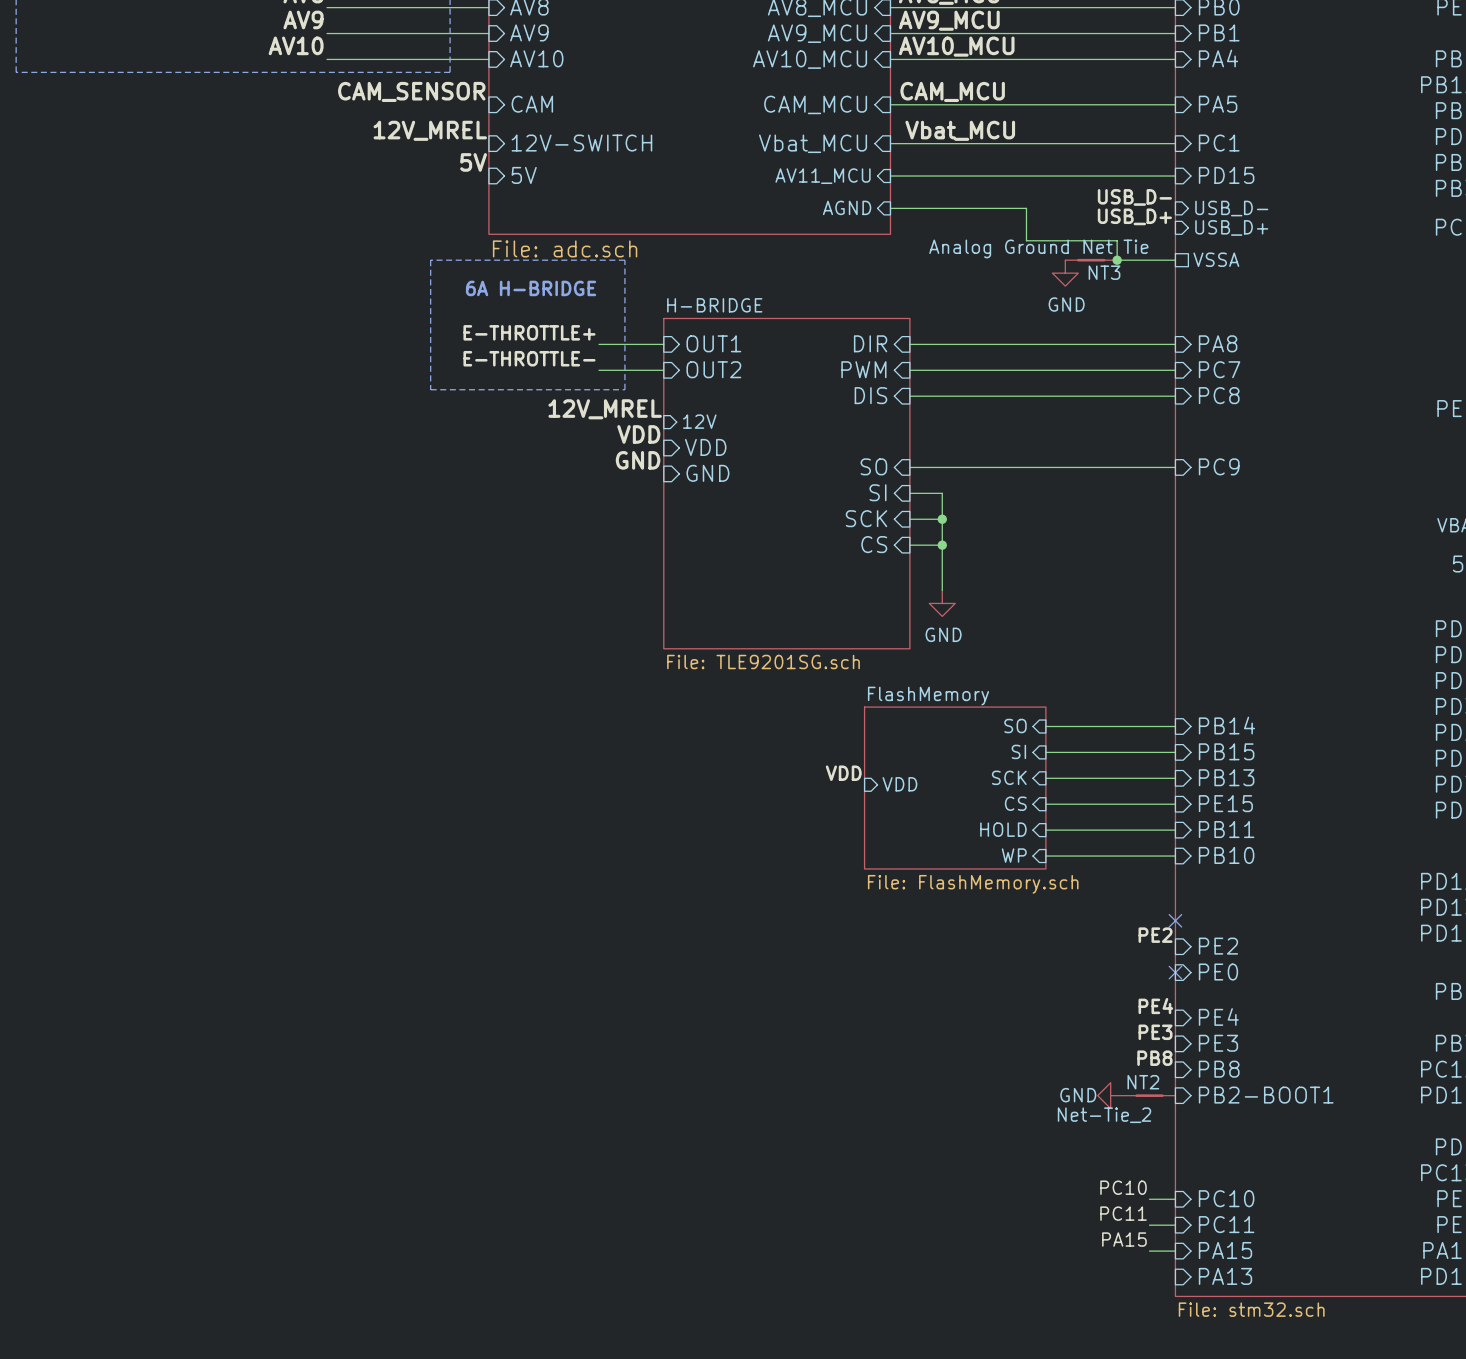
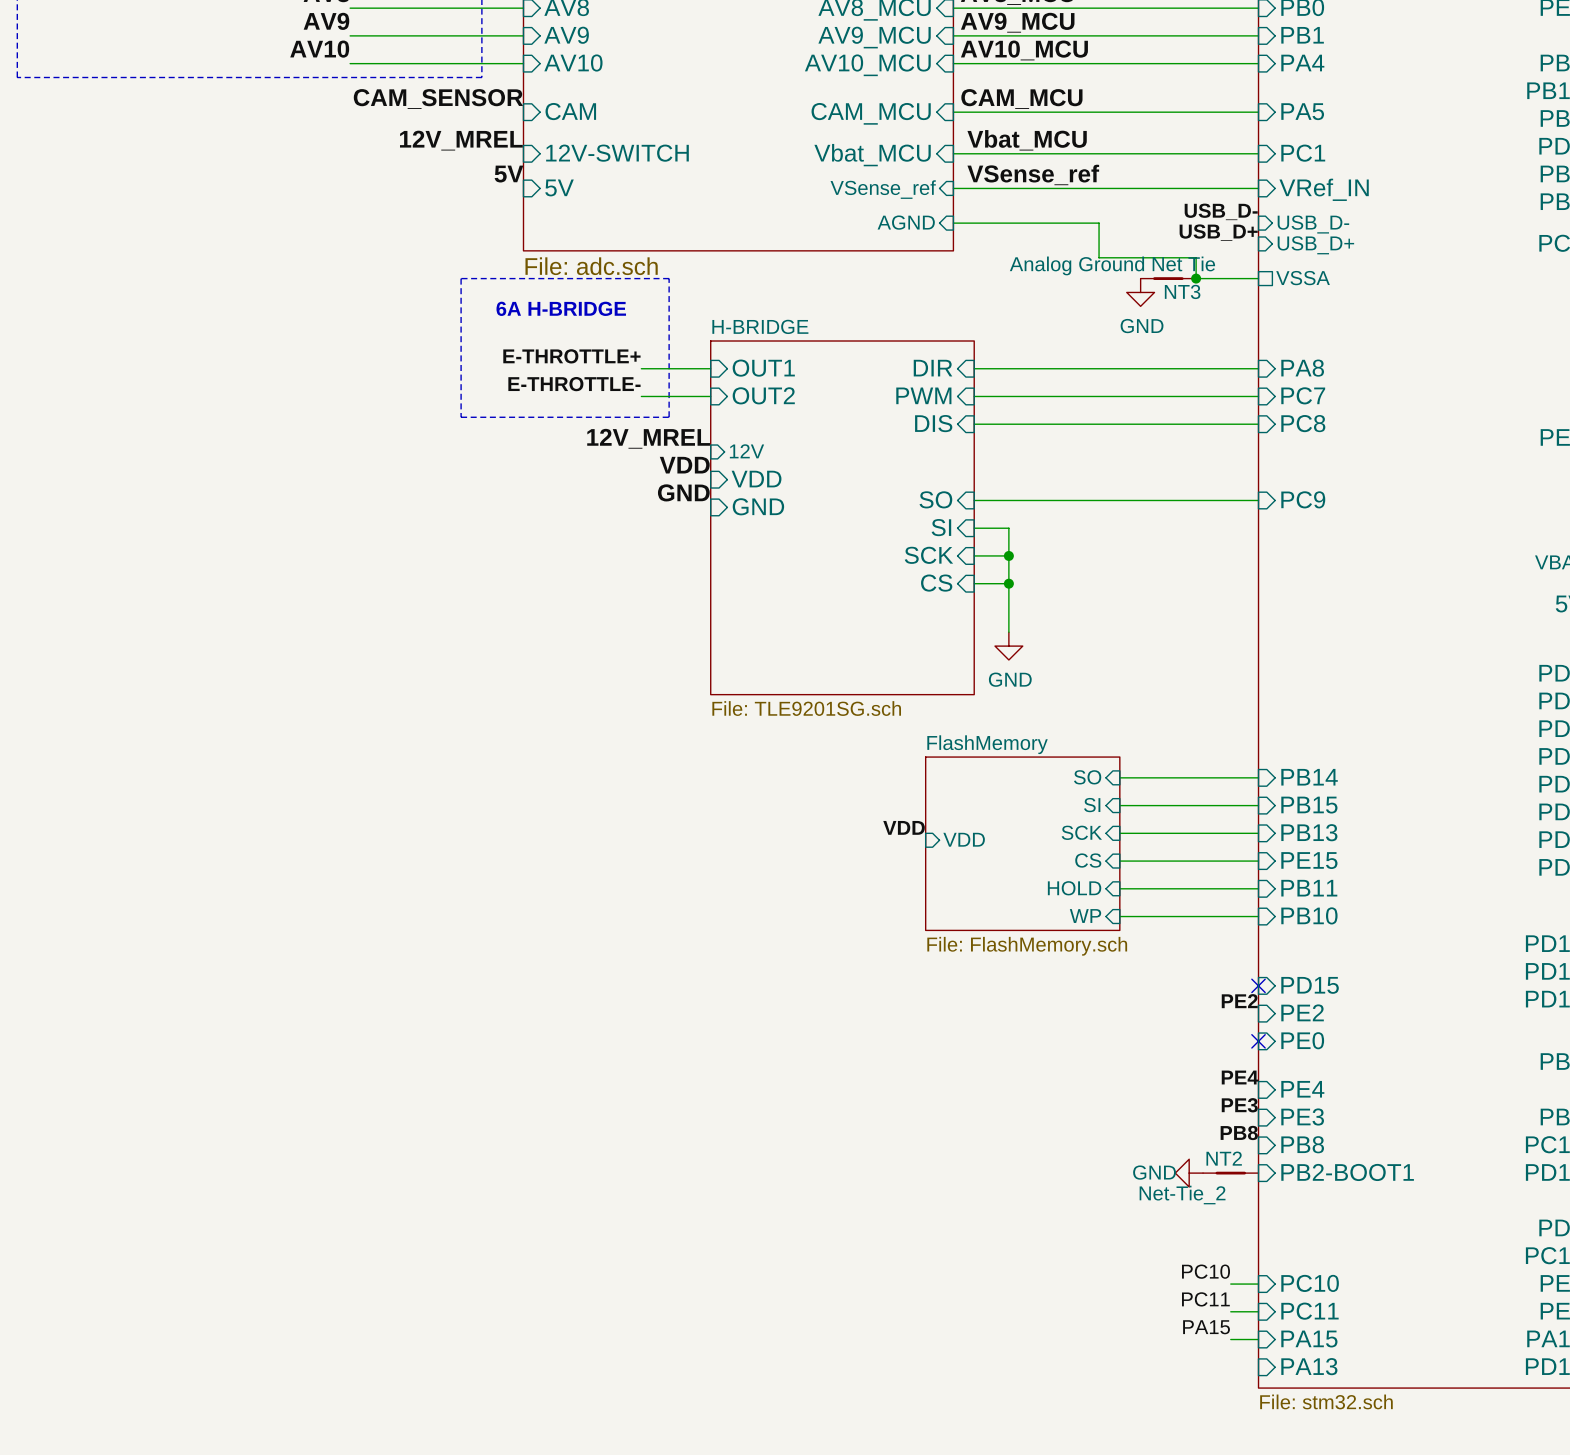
label: none -> VSense_ref (1033, 174)
sheet pin: PD15 (1226, 175) -> VRef_IN (1324, 189)
sheet pin: AV11_MCU (823, 176) -> VSense_ref (883, 189)
sheet pin: none -> PD15 (1310, 985)

